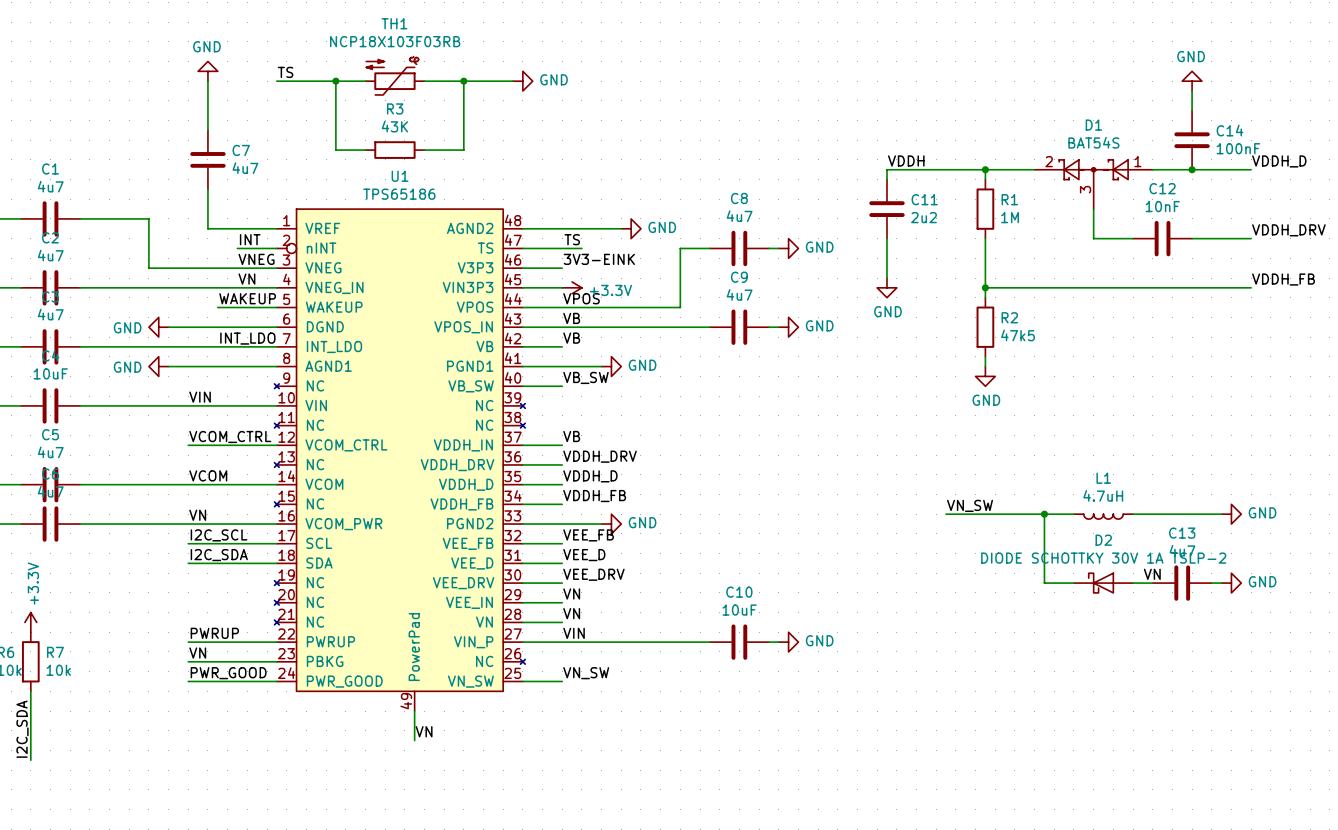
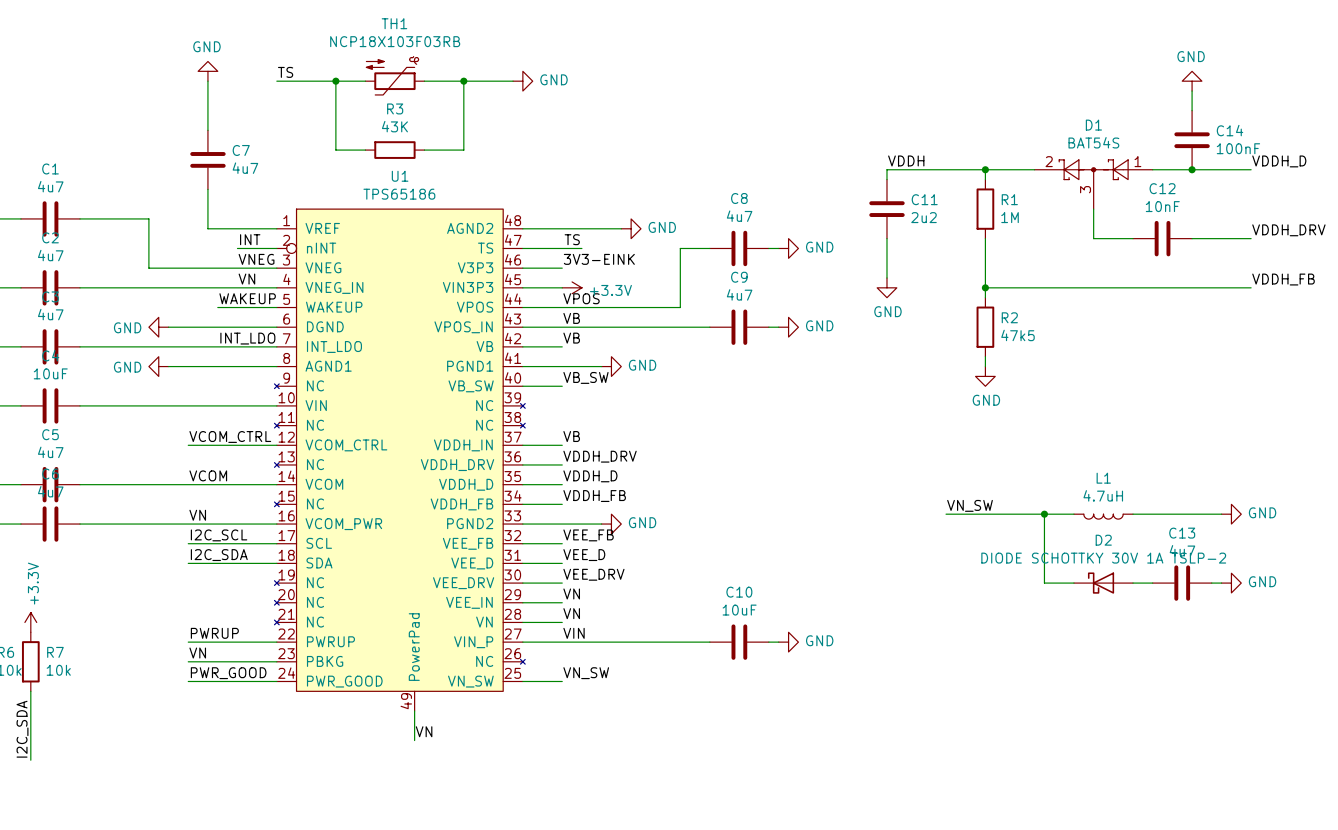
label: VIN (200, 397) -> none
label: VN (1152, 574) -> none

